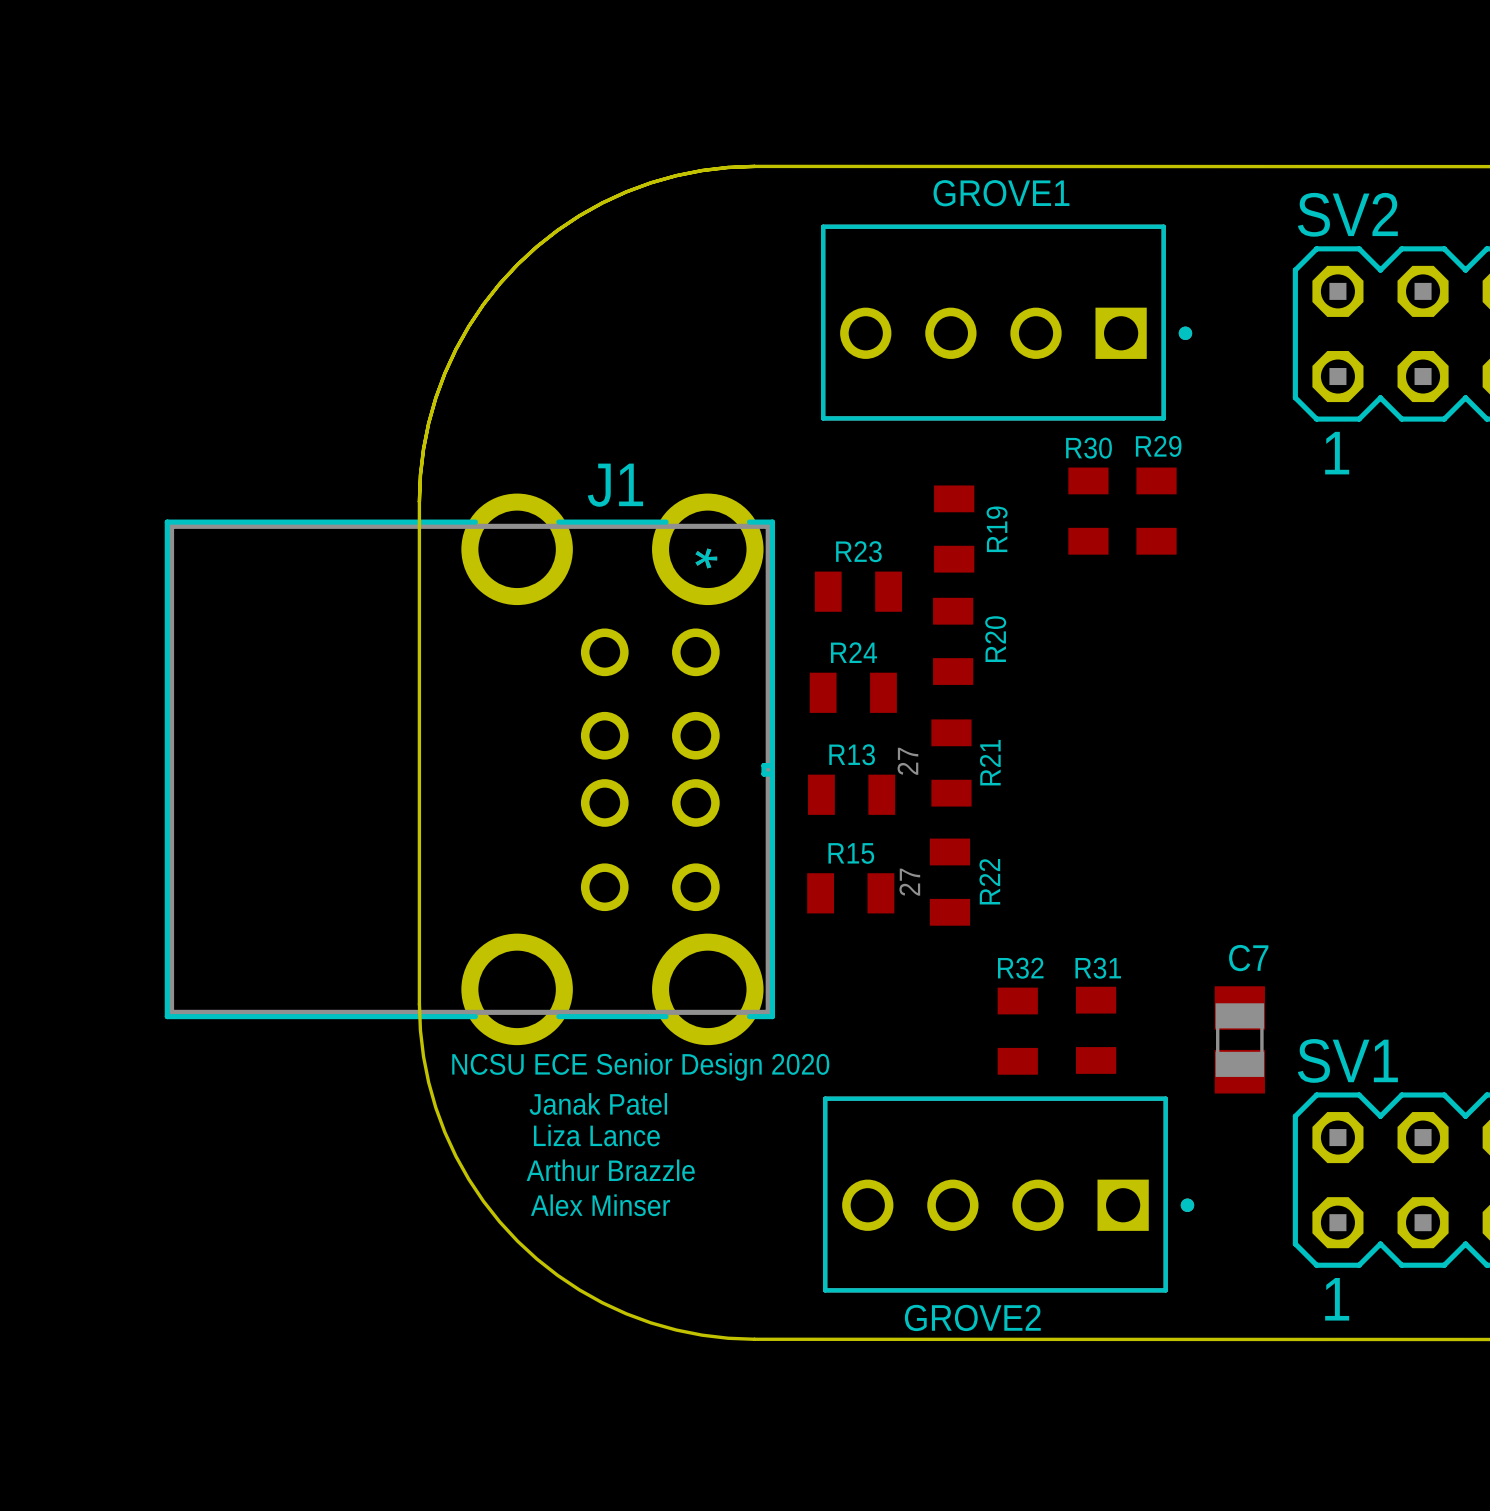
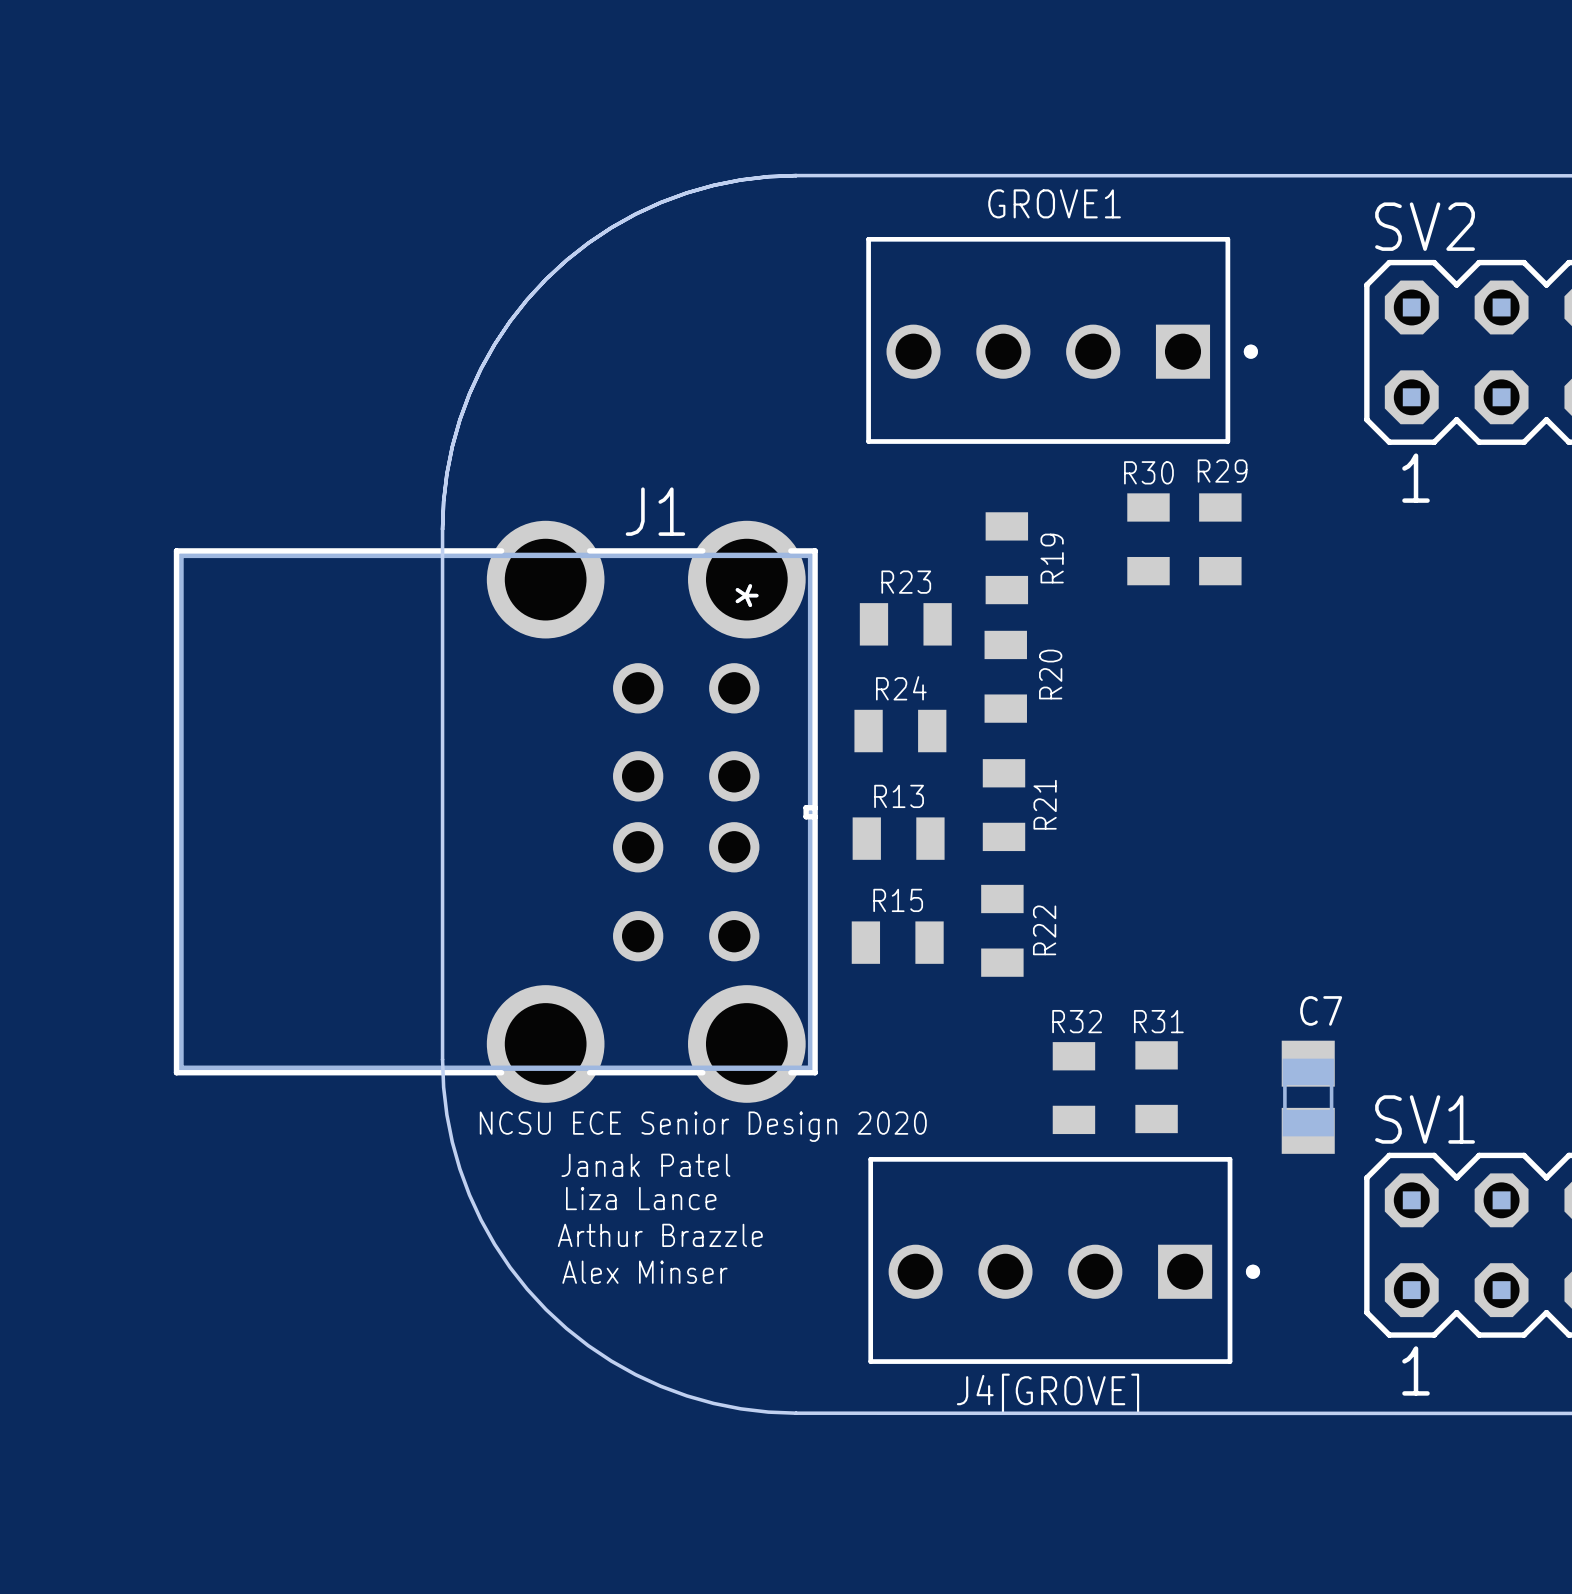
R21 value: 27 (907, 761) -> none
R22 value: 27 (909, 882) -> none
GROVE2 name: GROVE2 (972, 1317) -> J4[GROVE] (1048, 1393)

